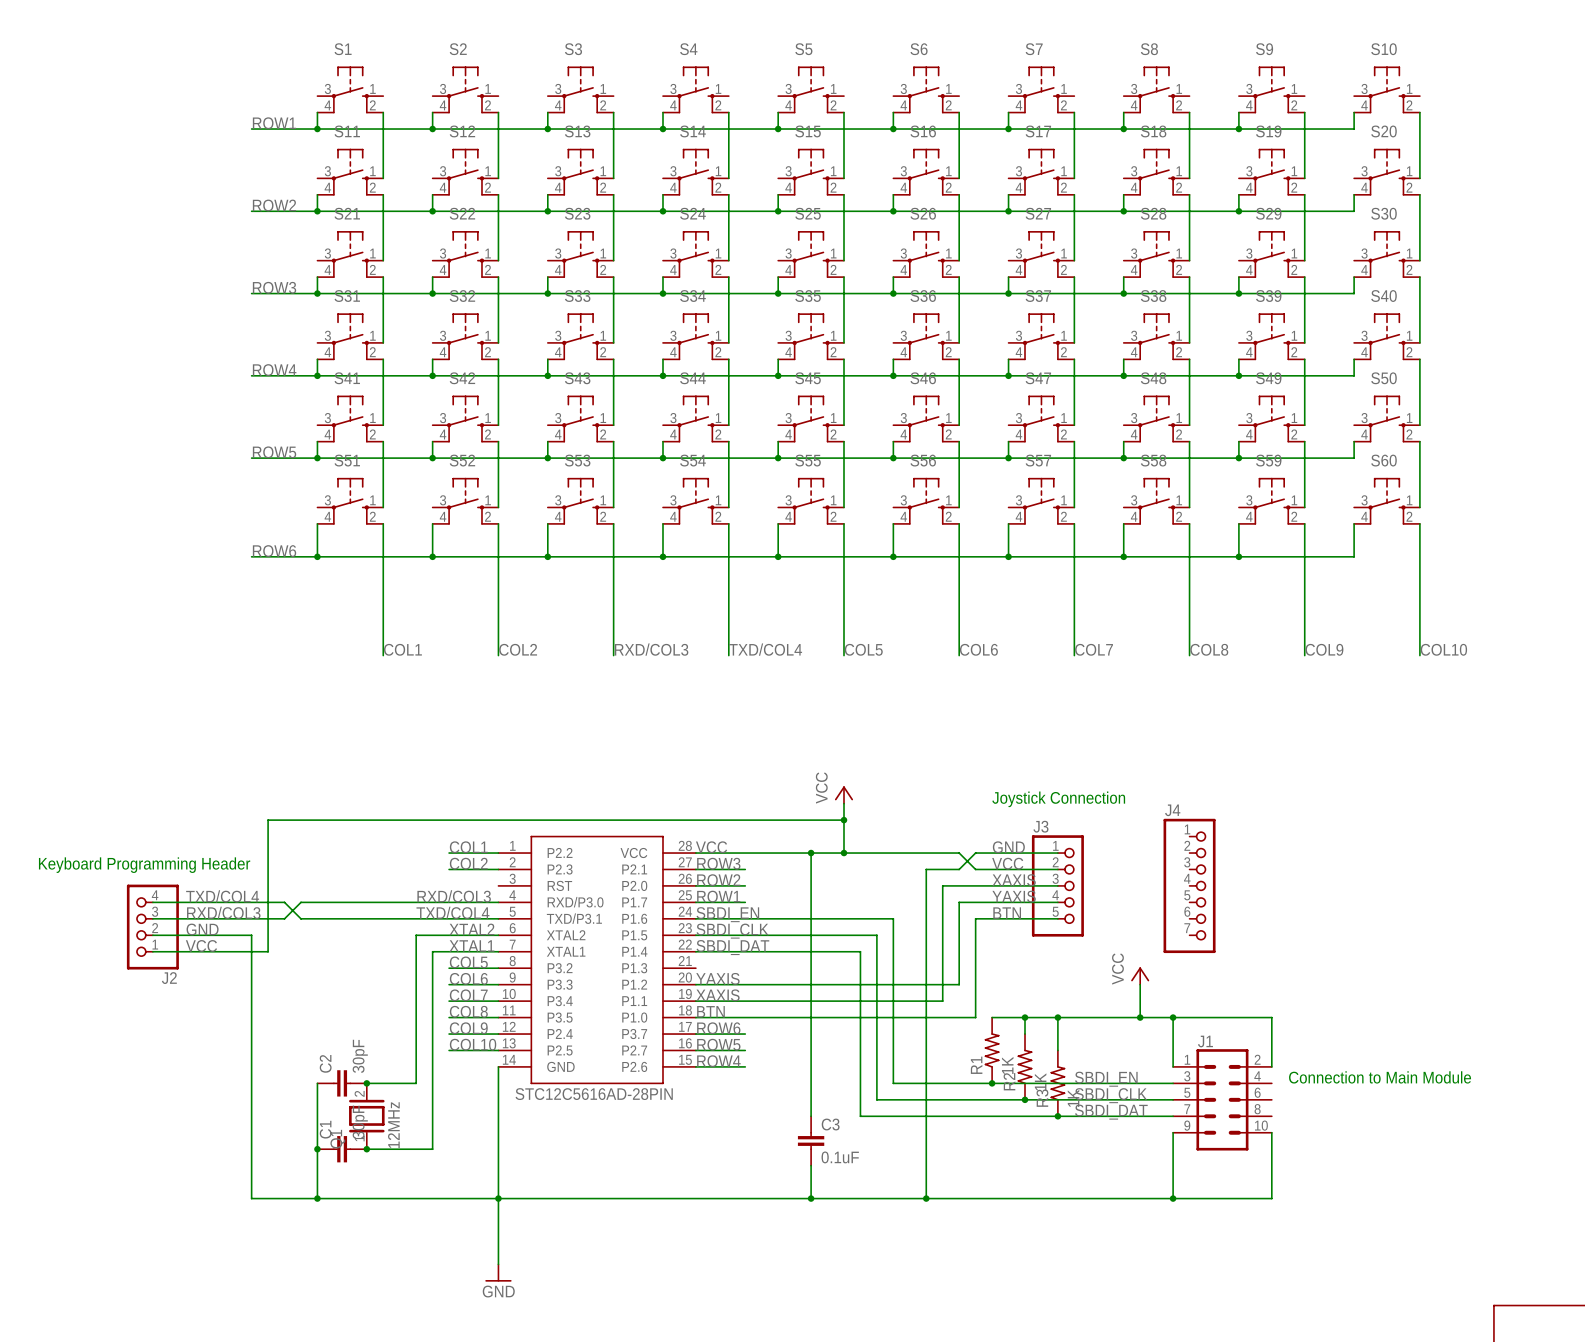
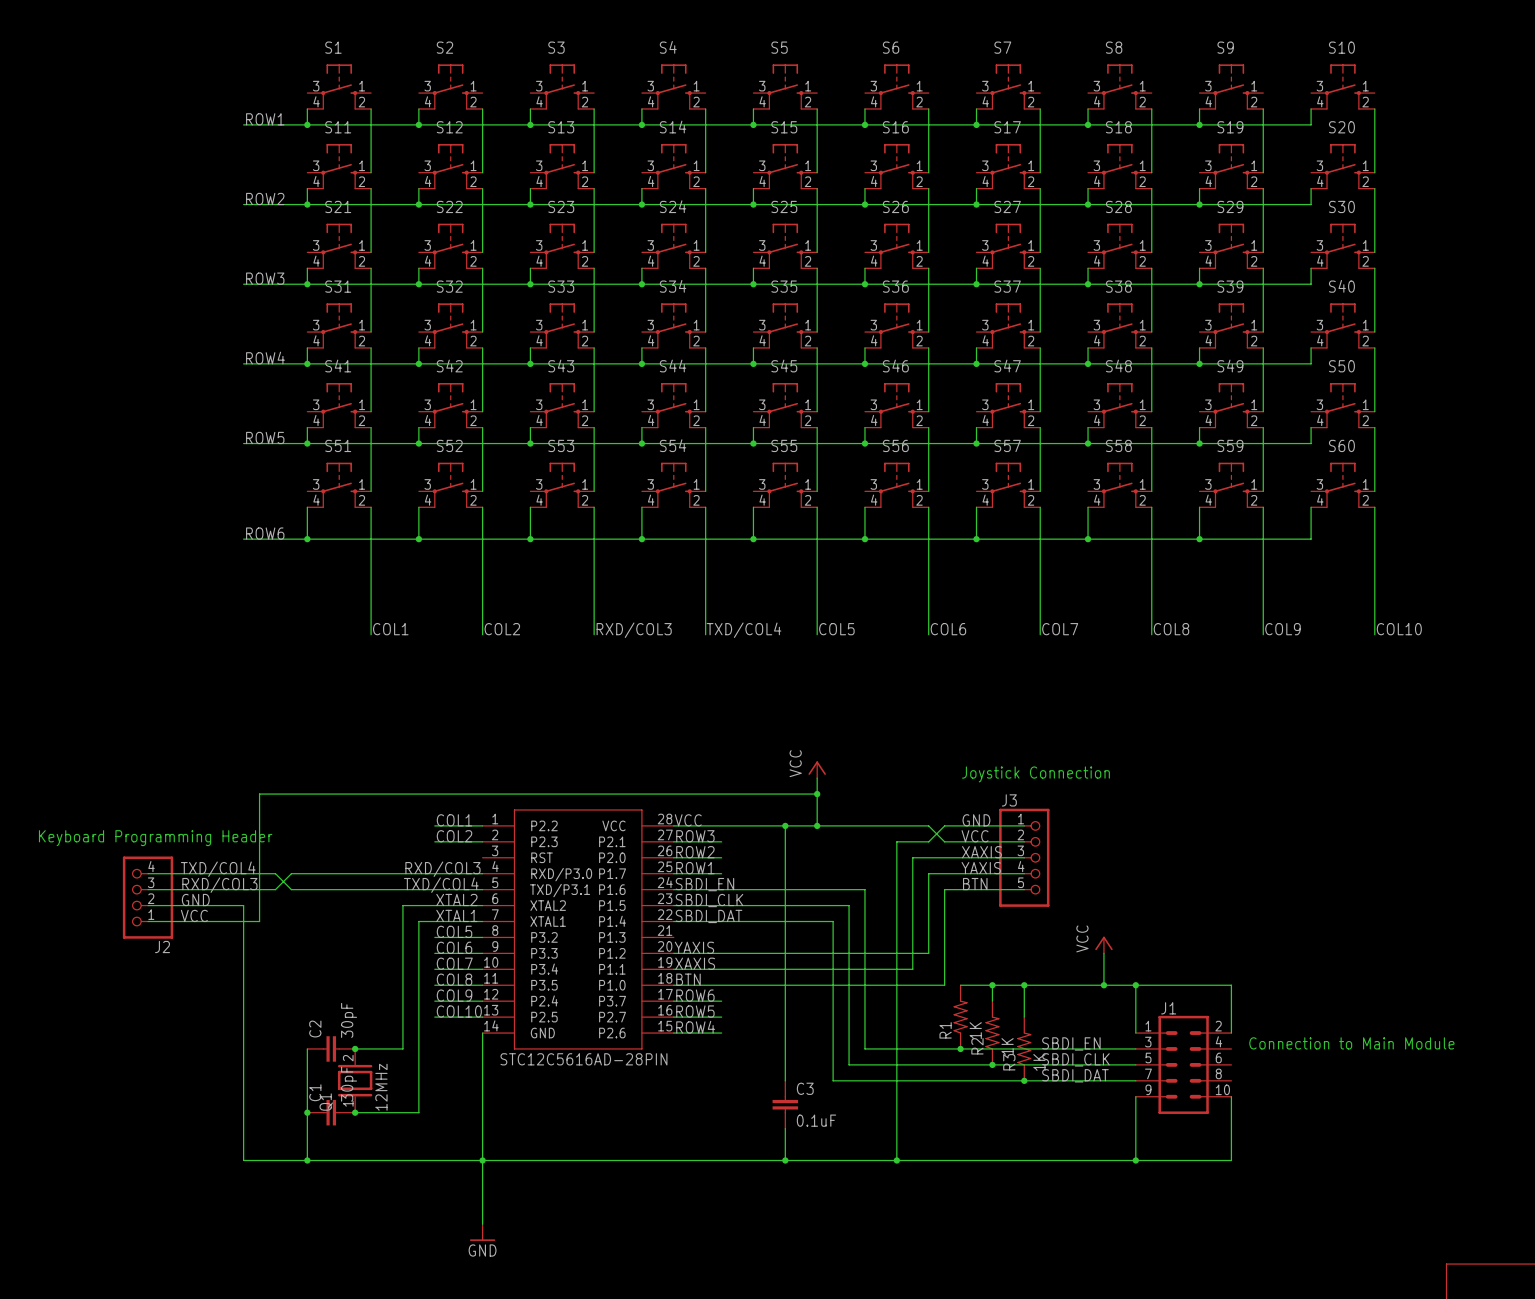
J4: (1189, 885) -> none

